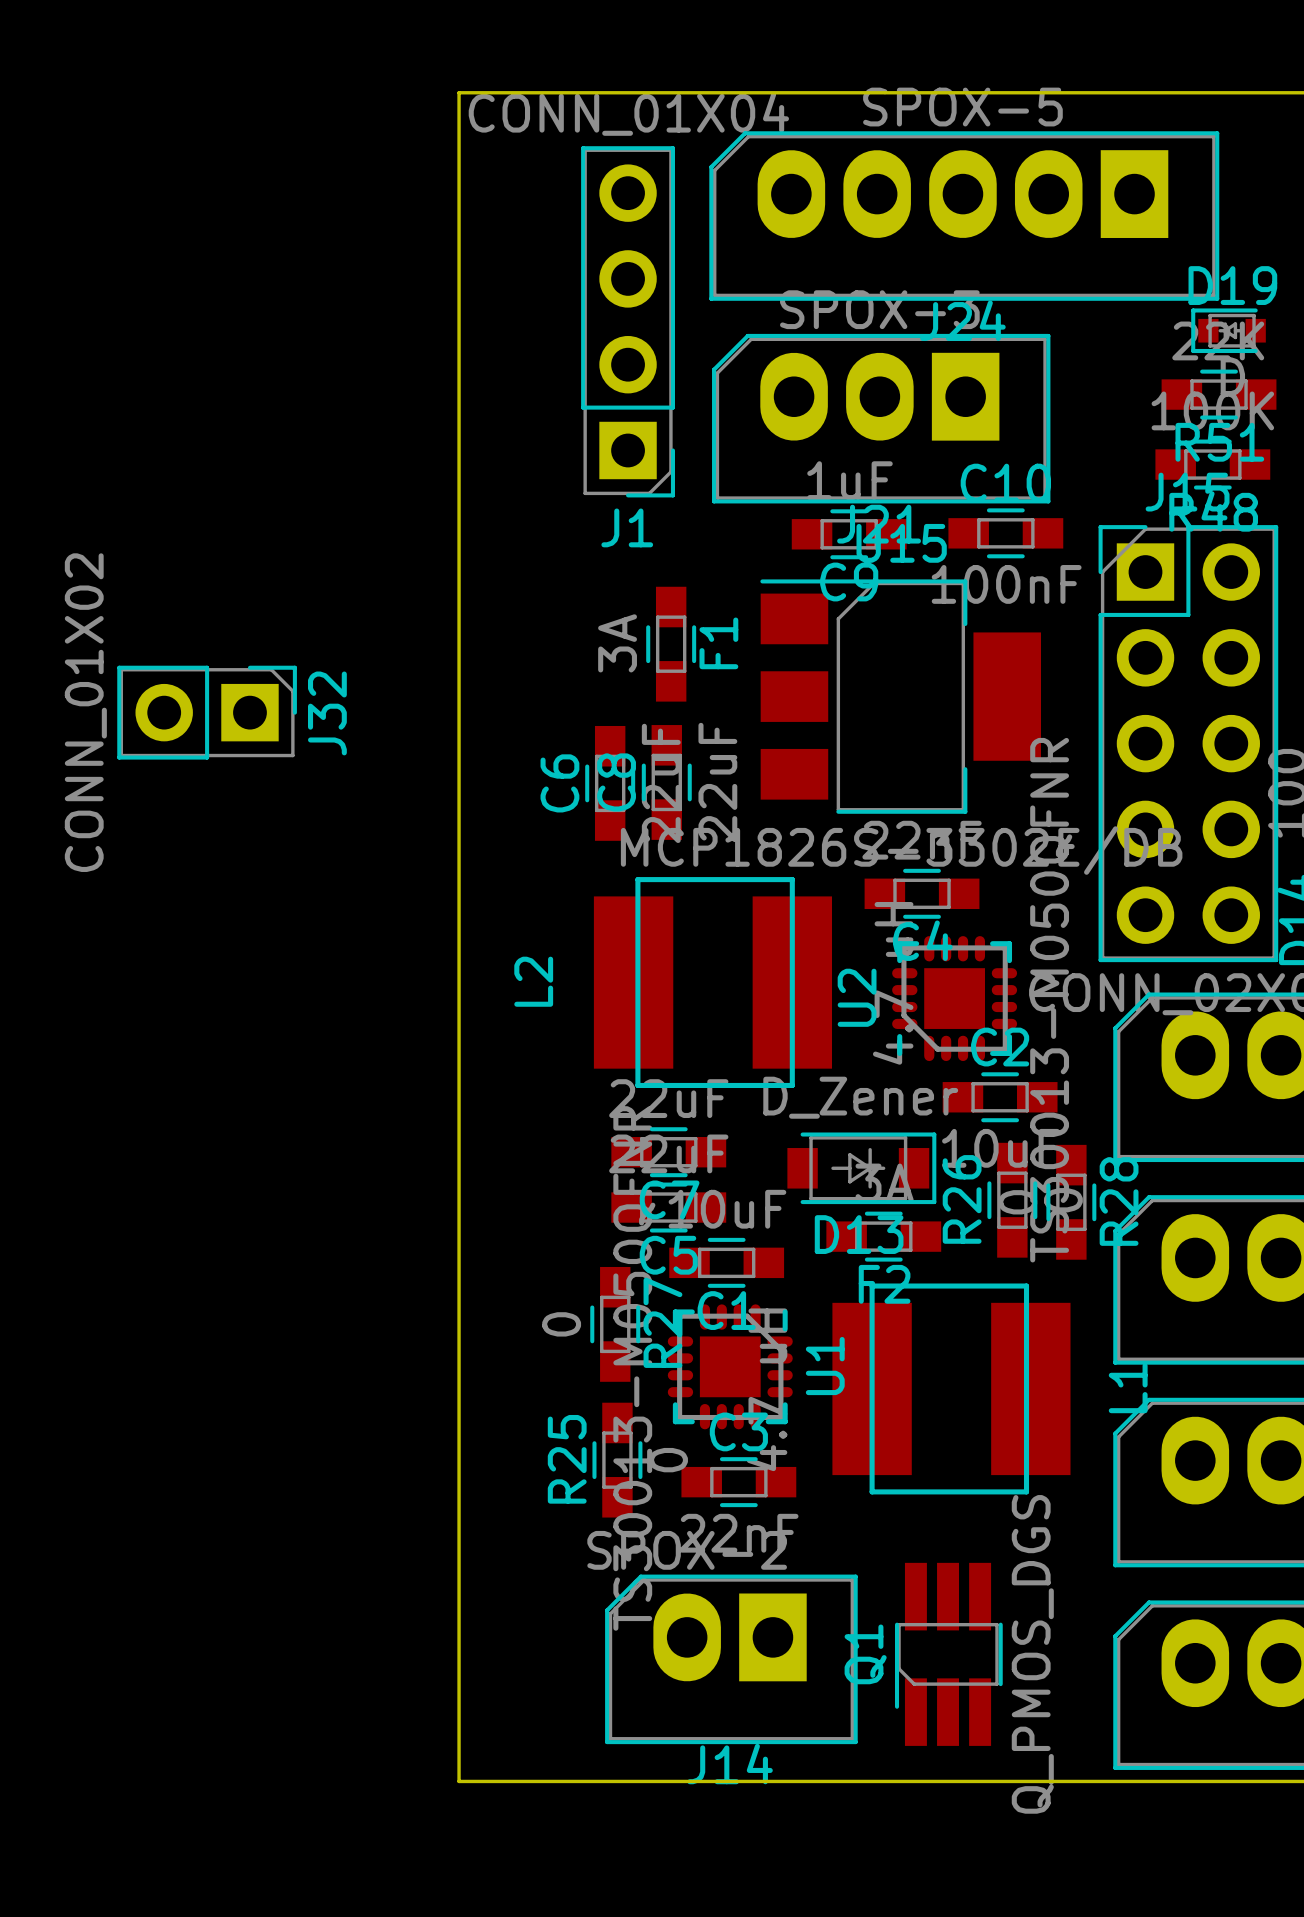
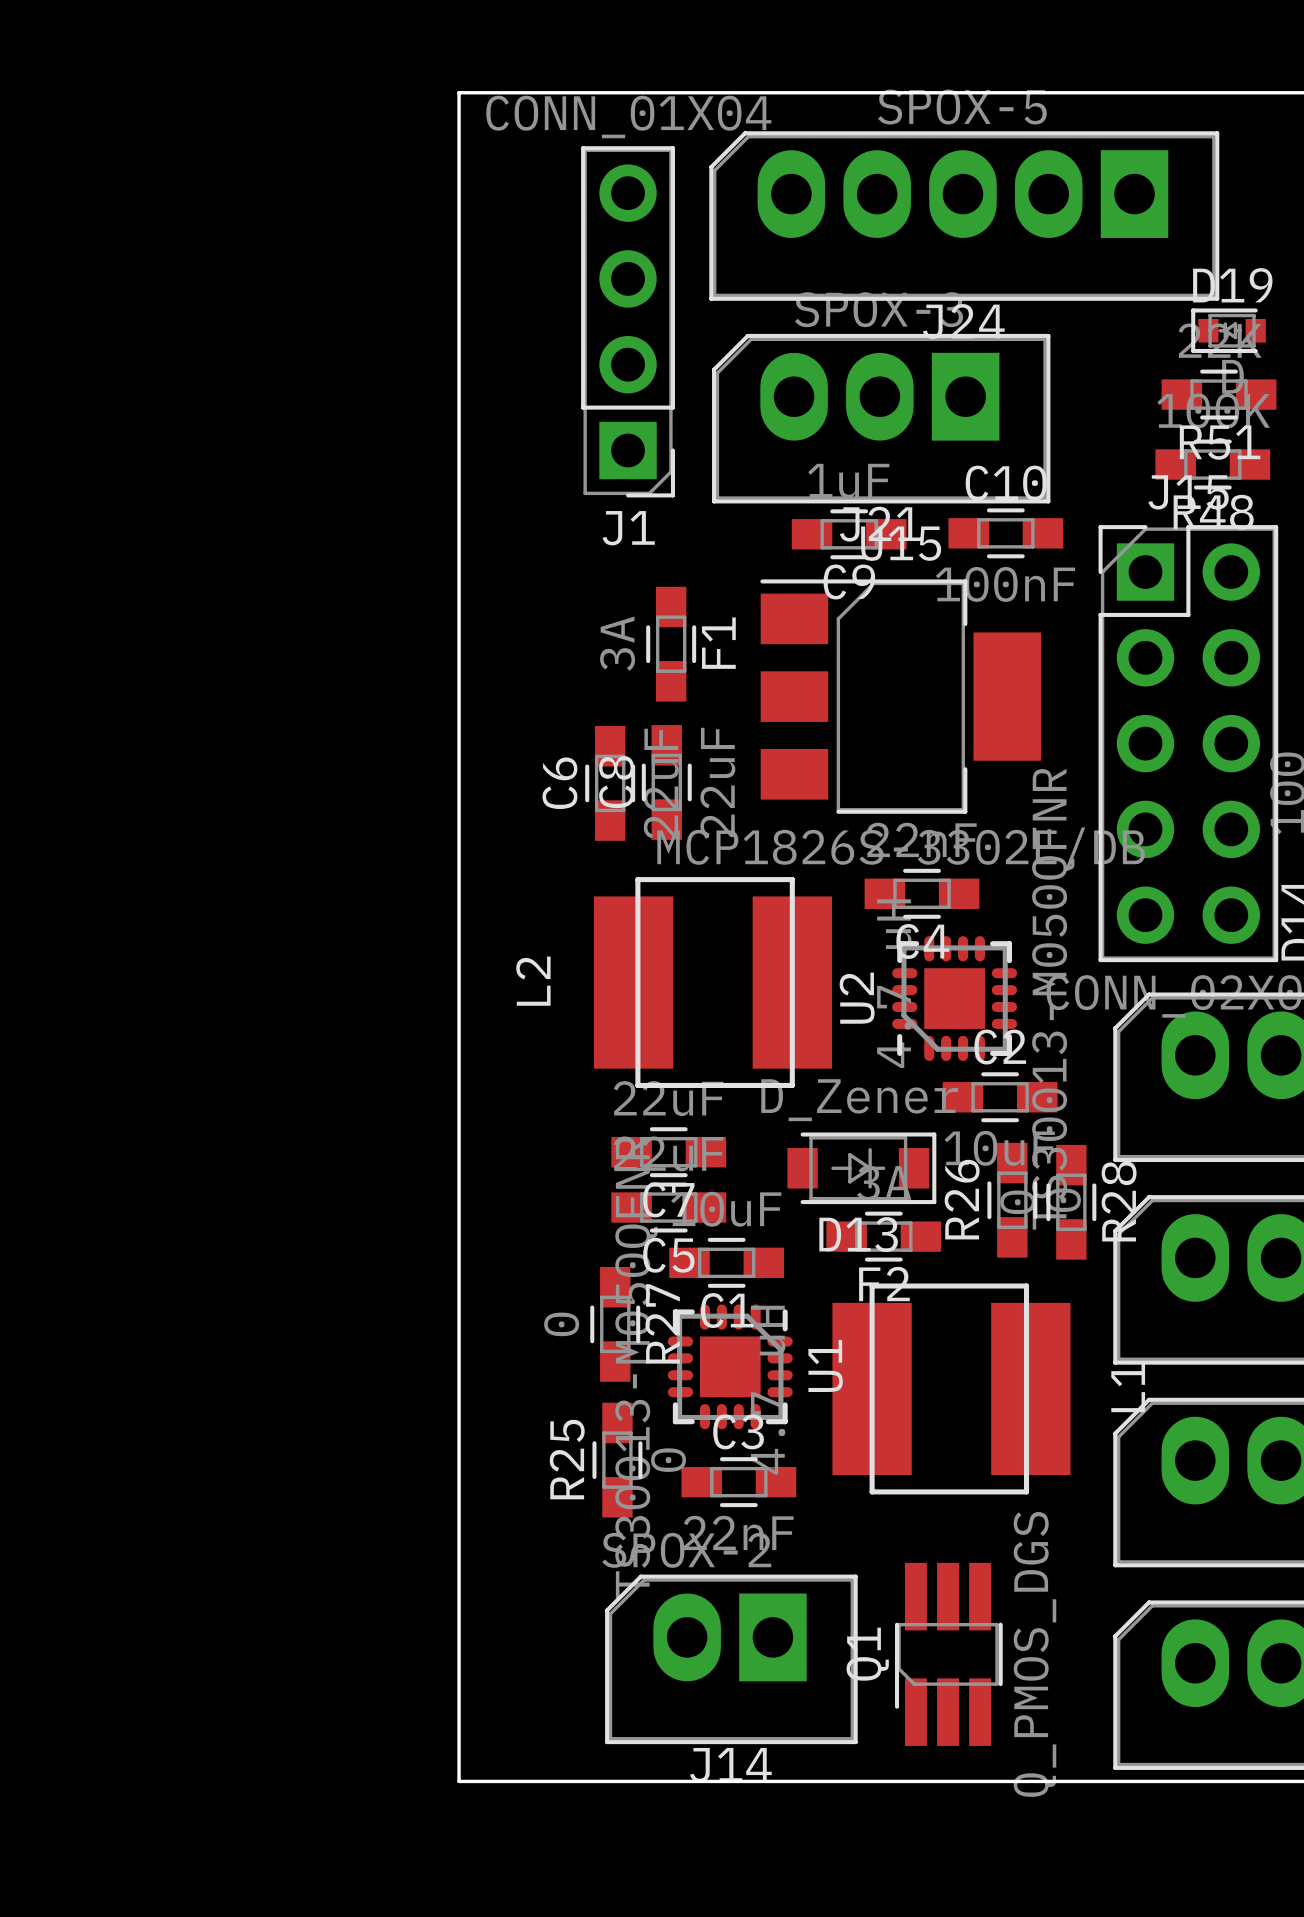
J32: CONN_01X02 (207, 712) -> none

